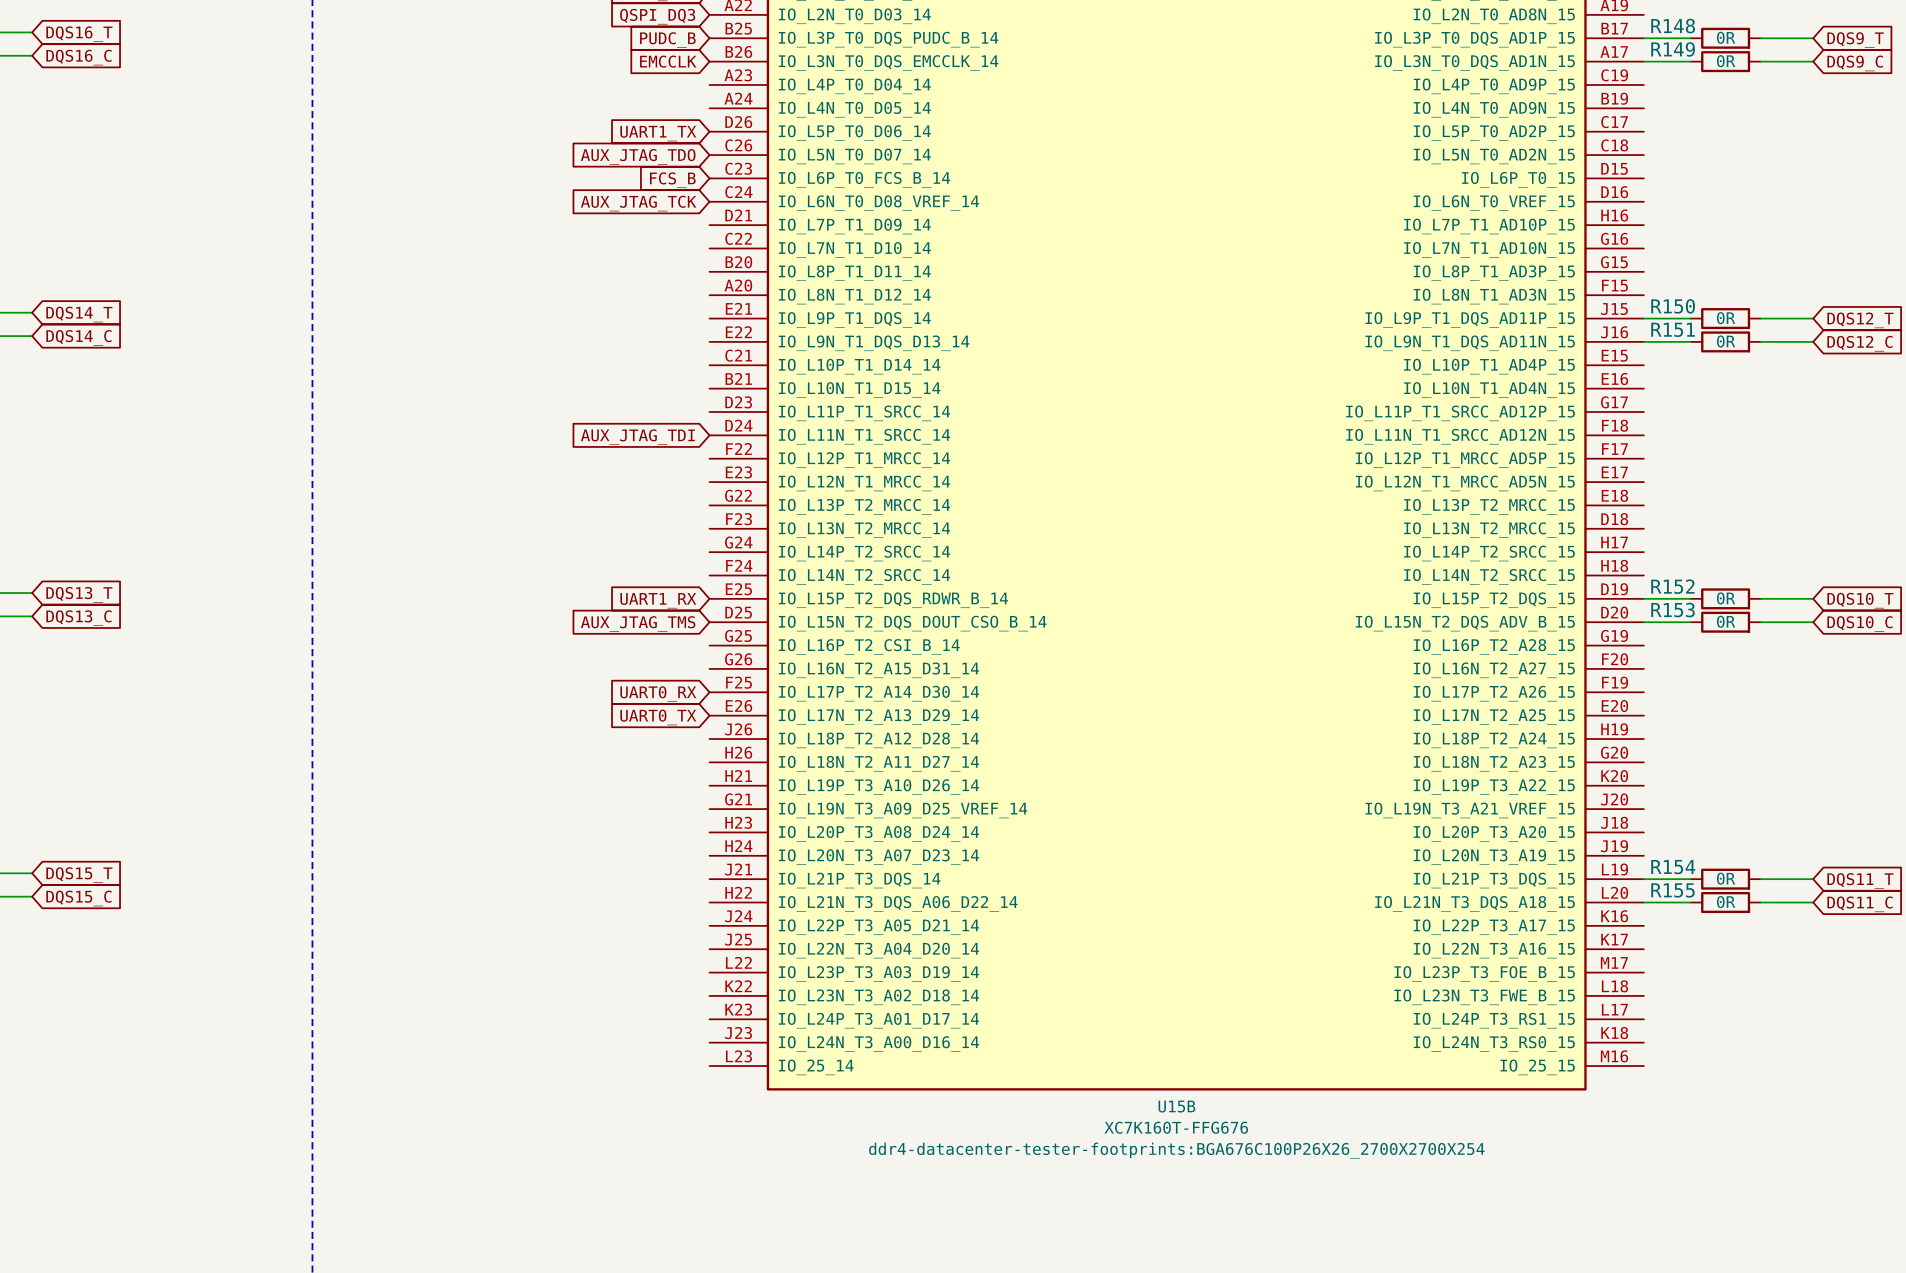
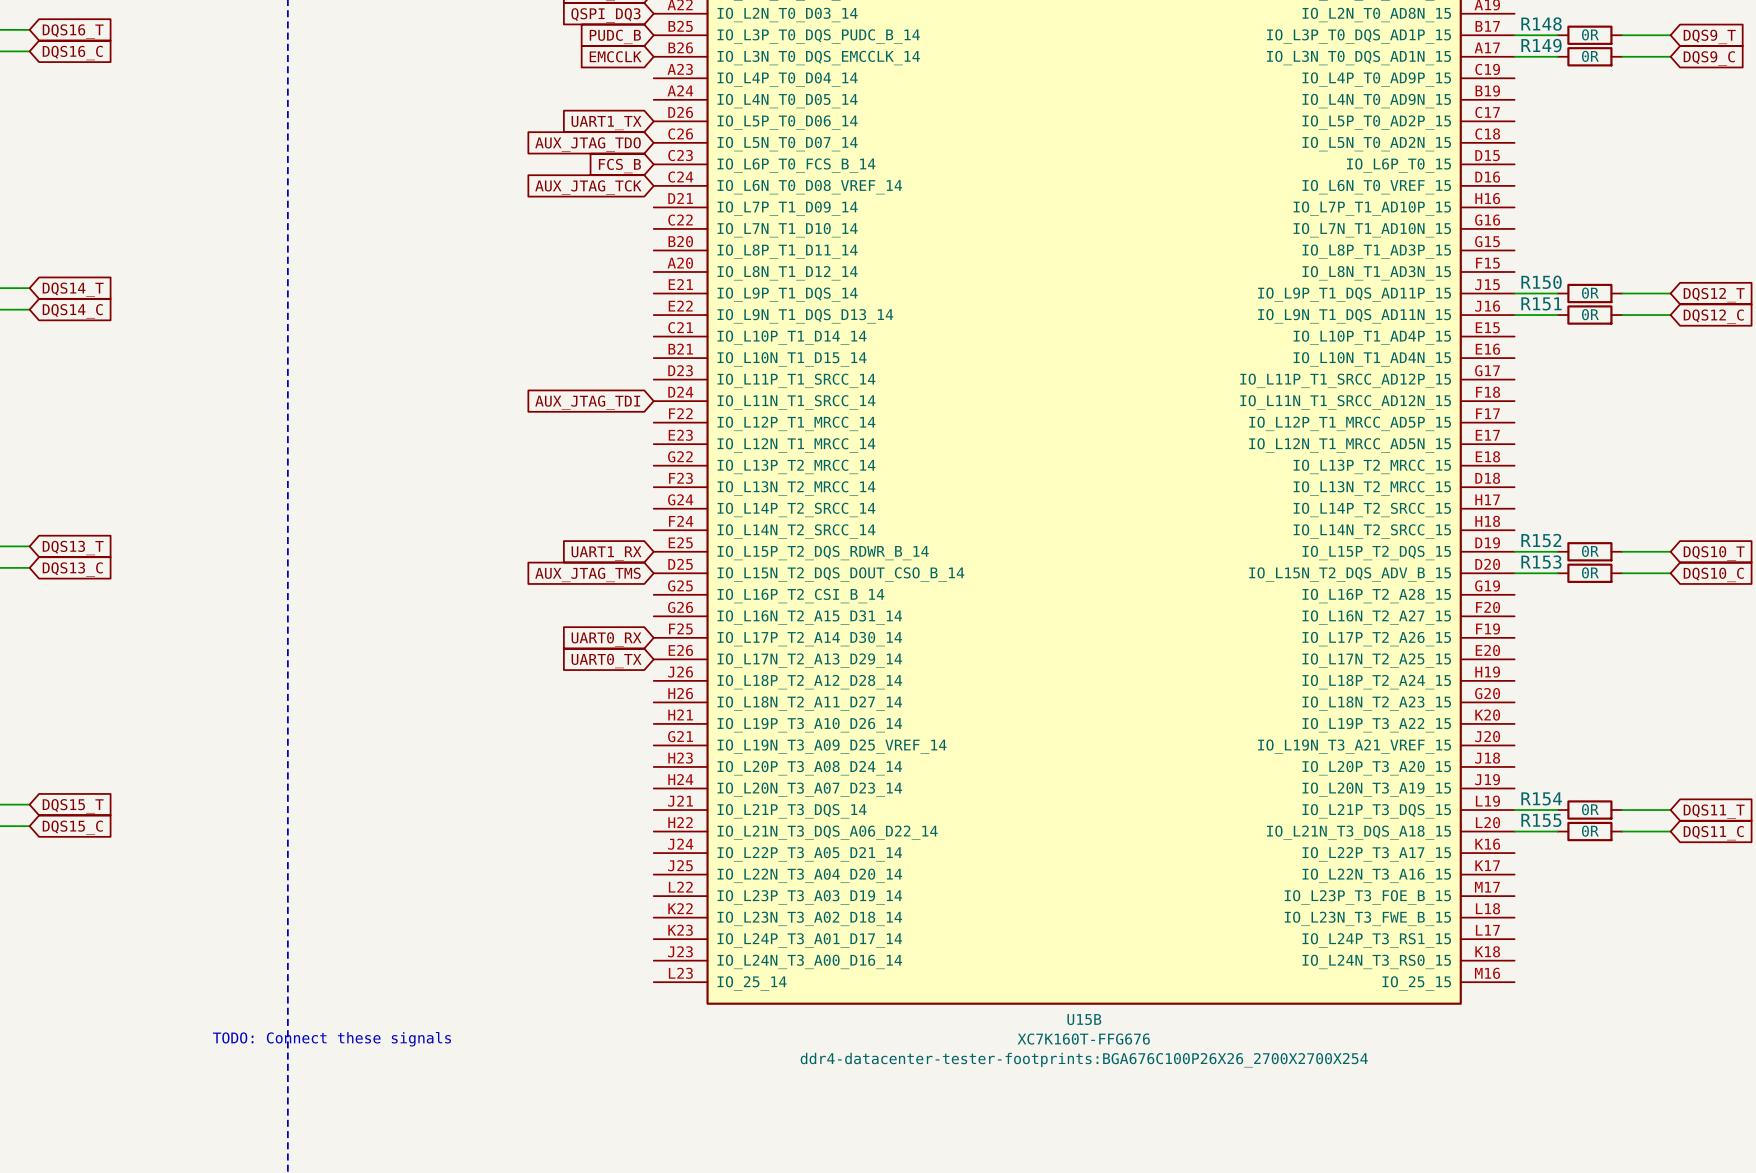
text: none -> TODO: Connect these signals (331, 1039)

